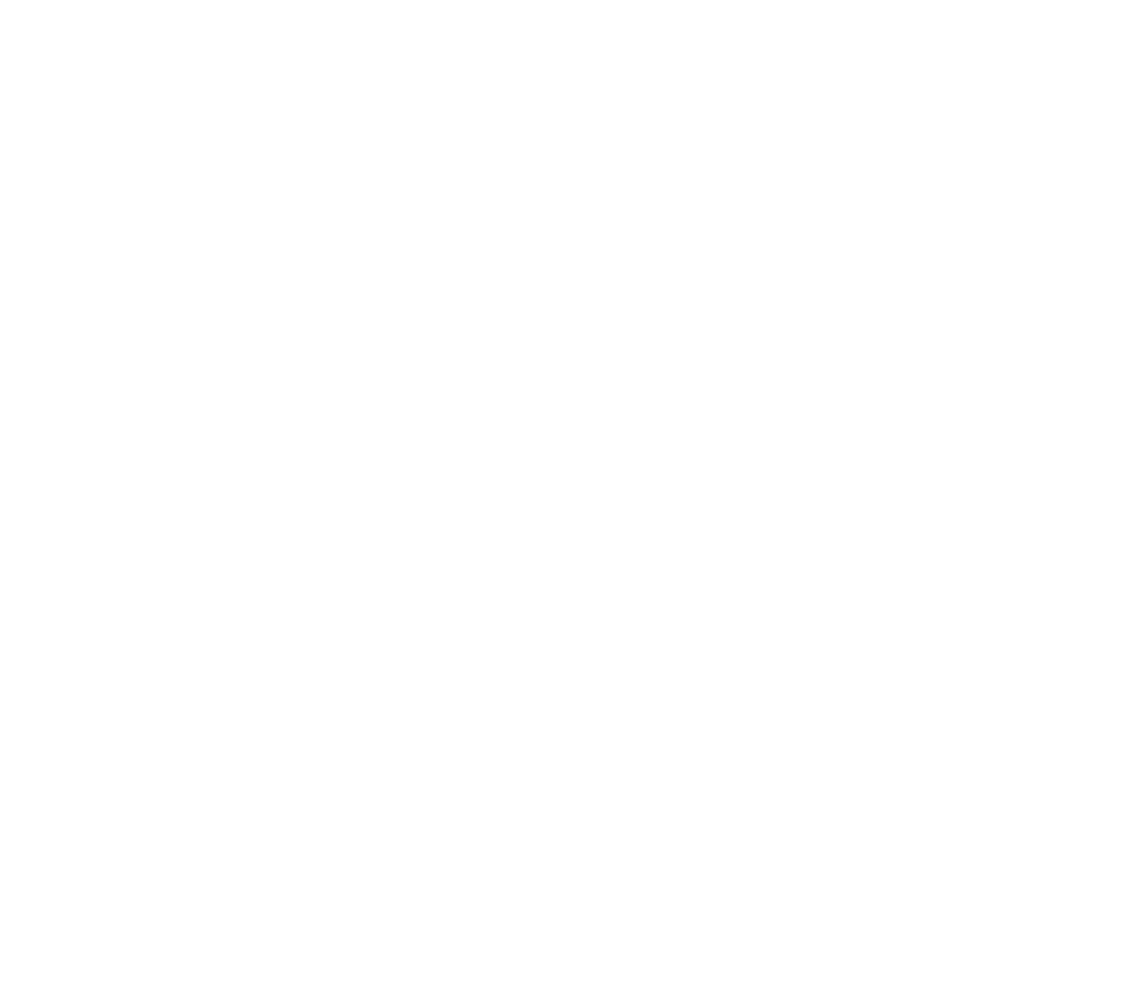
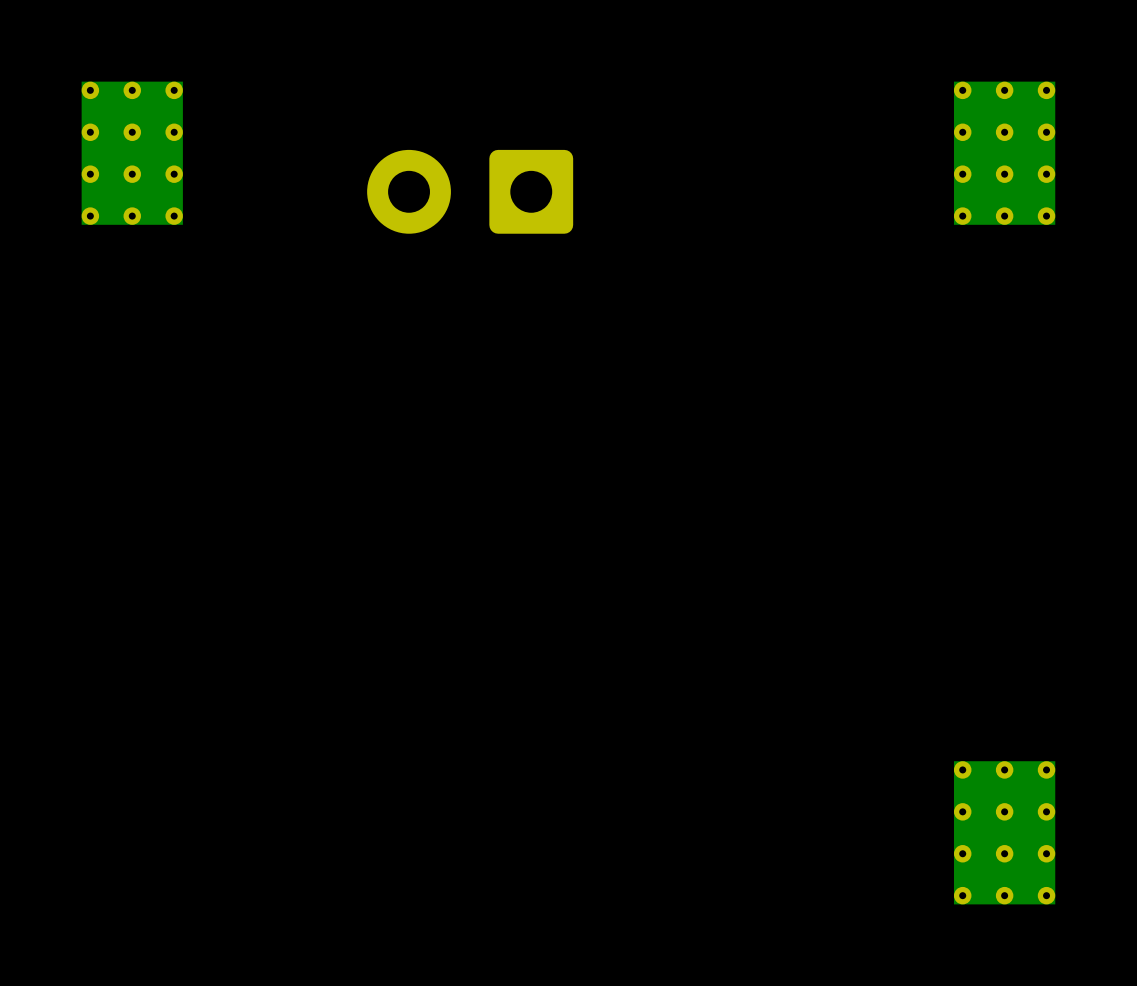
part: none -> (132, 153)
part: none -> (1004, 153)
part: none -> (470, 191)
part: none -> (1004, 832)

